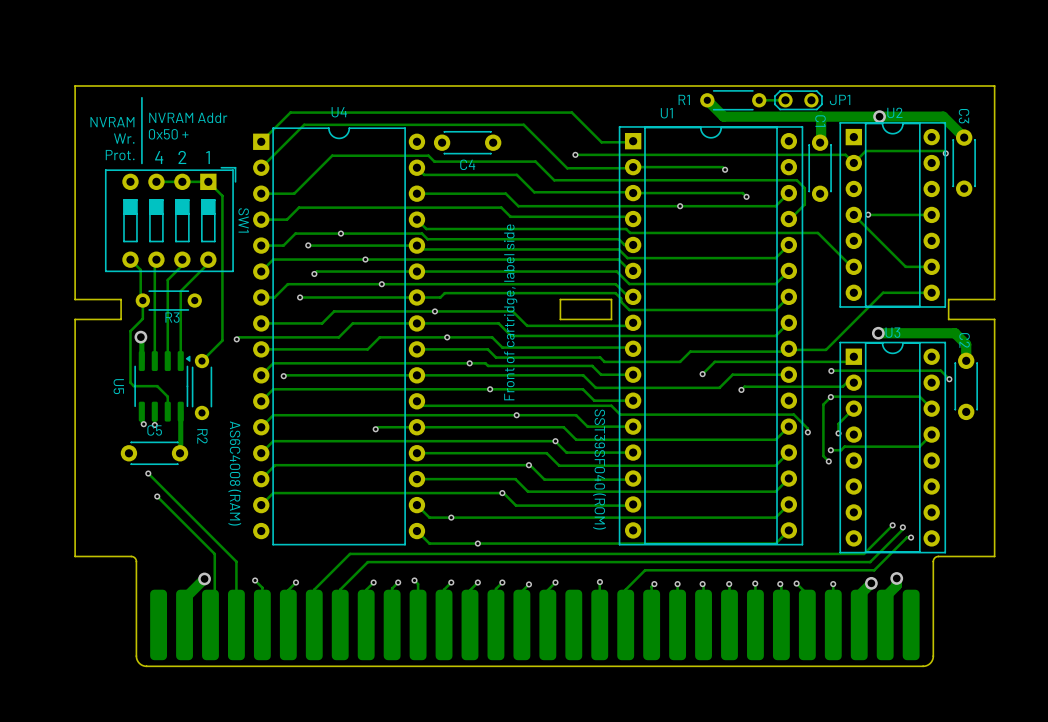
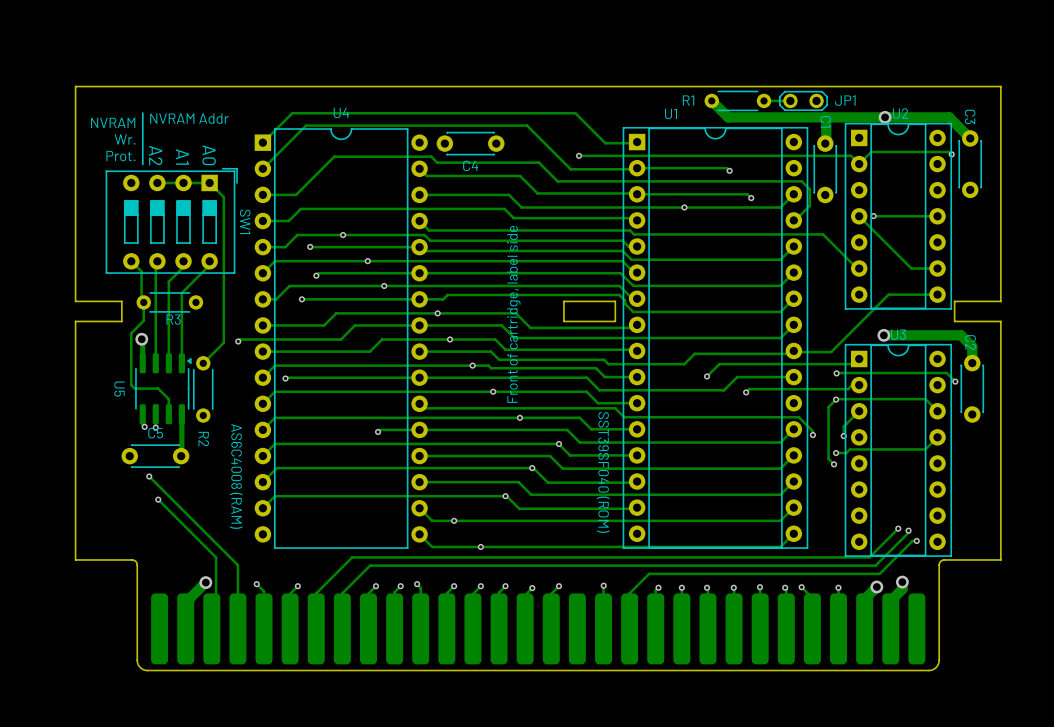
line: (141, 97) (141, 112) -> none
text: 0x50 + (168, 134) -> none
text: none -> A2 (155, 155)
text: 4 (159, 157) -> none
text: 2 (182, 157) -> A1 (182, 157)
text: 1 (208, 157) -> A0 (209, 155)

